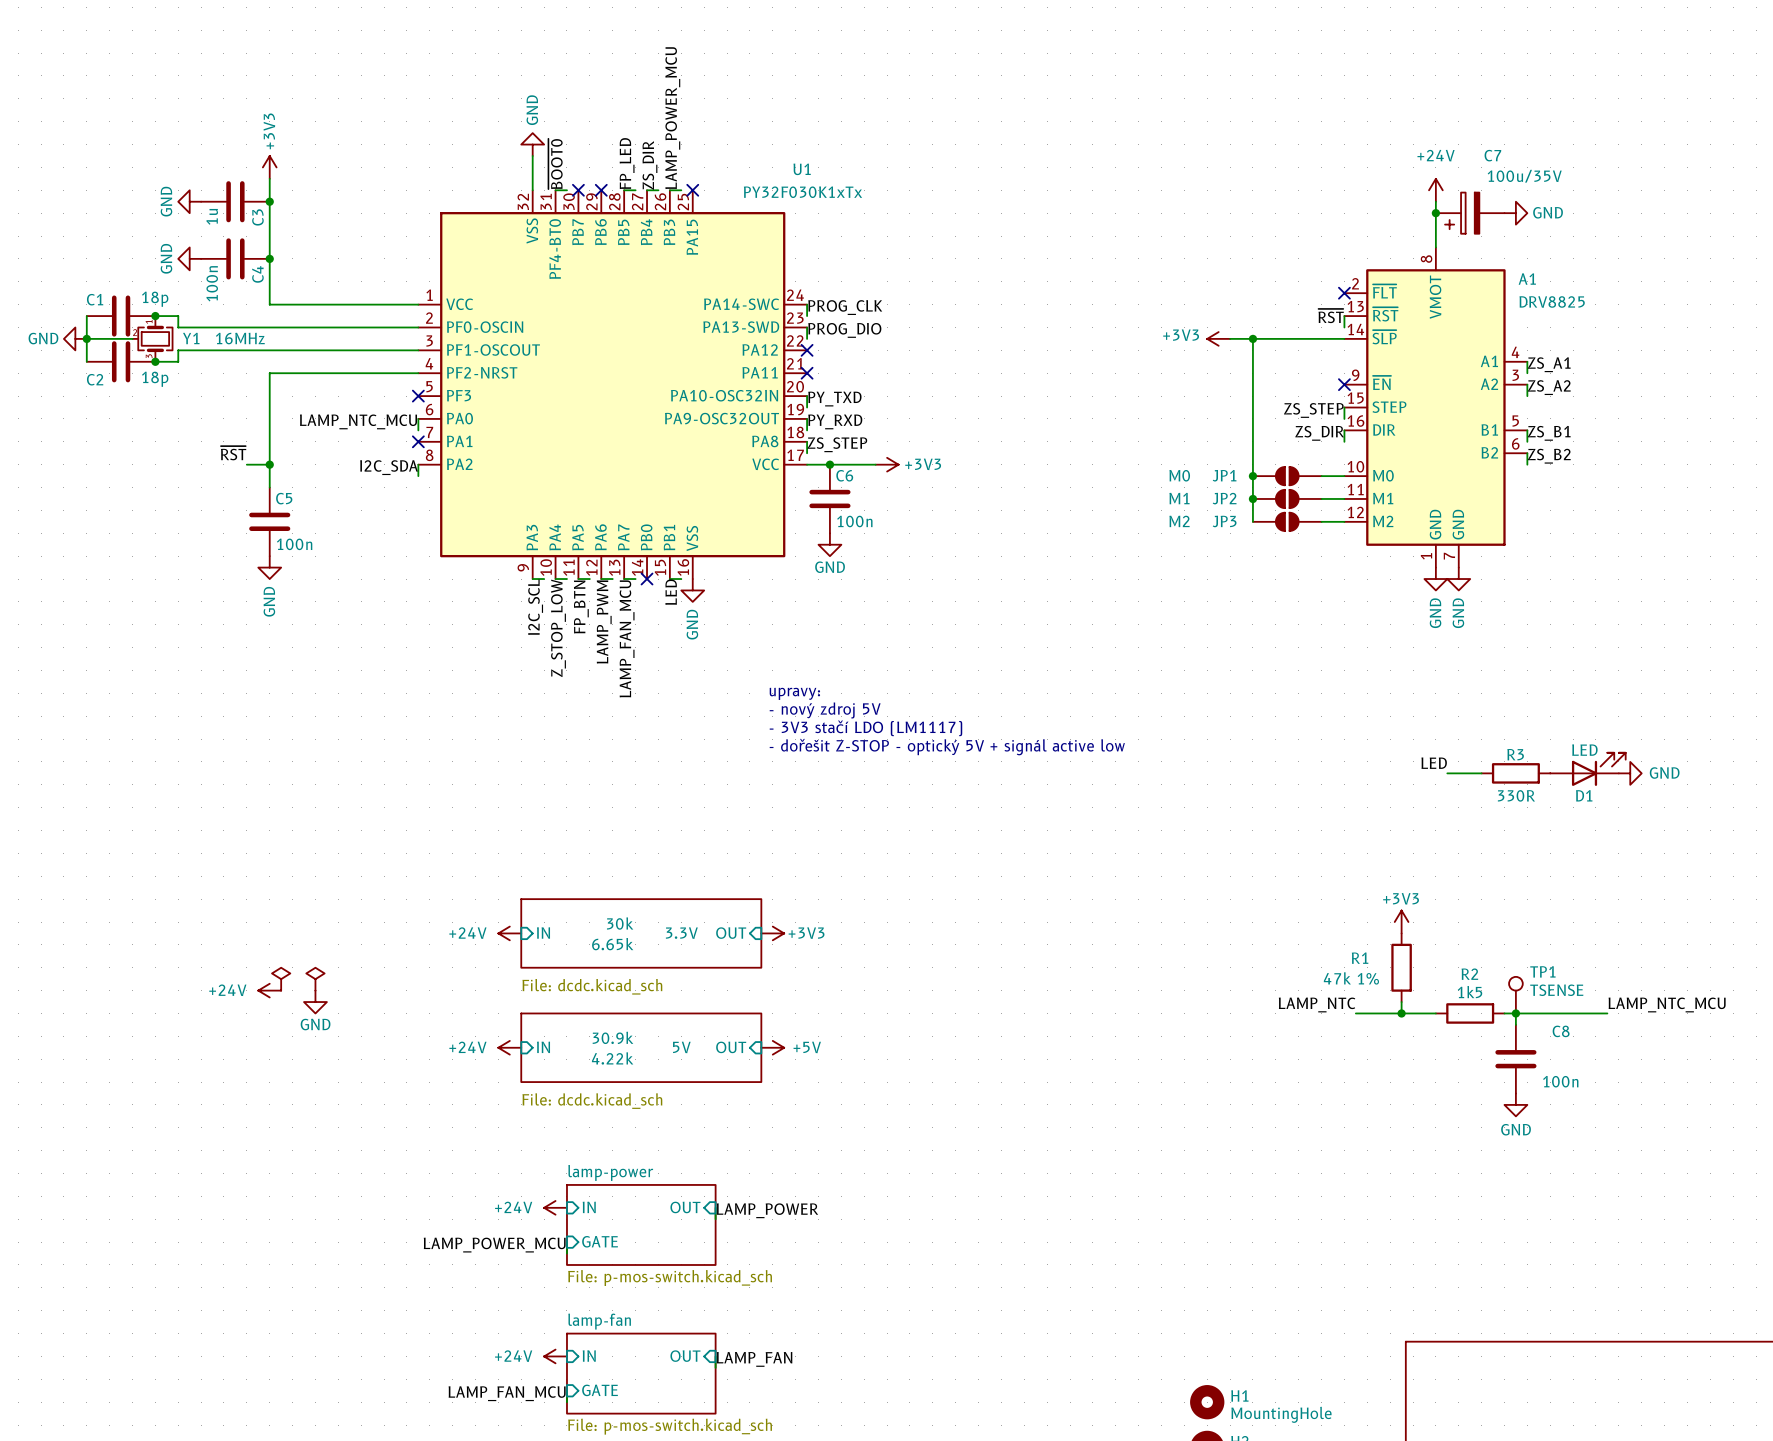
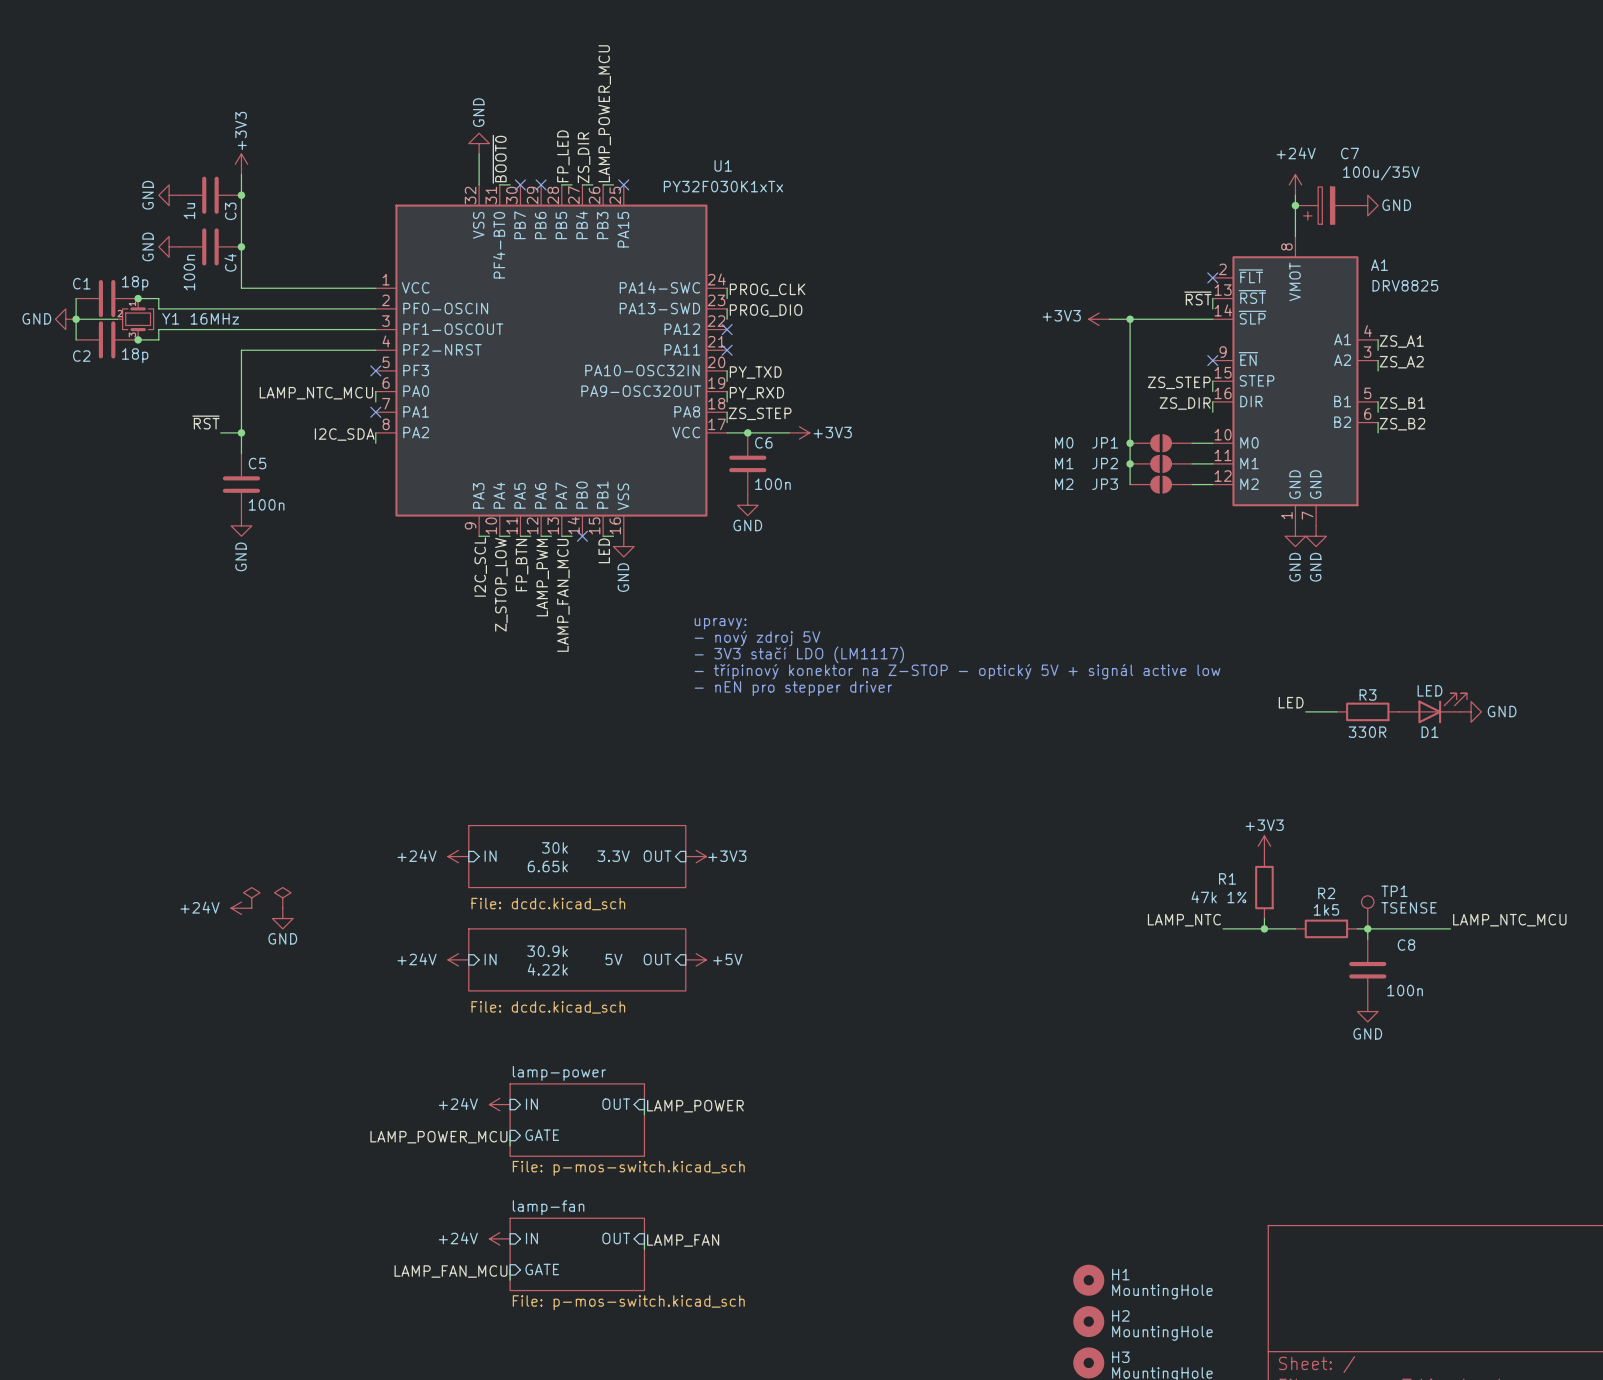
text: none -> upravy: (720, 623)
text: upravy: (794, 693) -> - nový zdroj 5V (757, 638)
text: - nový zdroj 5V (825, 710) -> - 3V3 stačí LDO (LM1117) (799, 654)
text: - 3V3 stačí LDO (LM1117) (865, 728) -> - třípinový konektor na Z-STOP - optický 5V + signál active low (957, 671)
text: - dořešit Z-STOP - optický 5V + signál active low (947, 747) -> - nEN pro stepper driver (793, 688)

